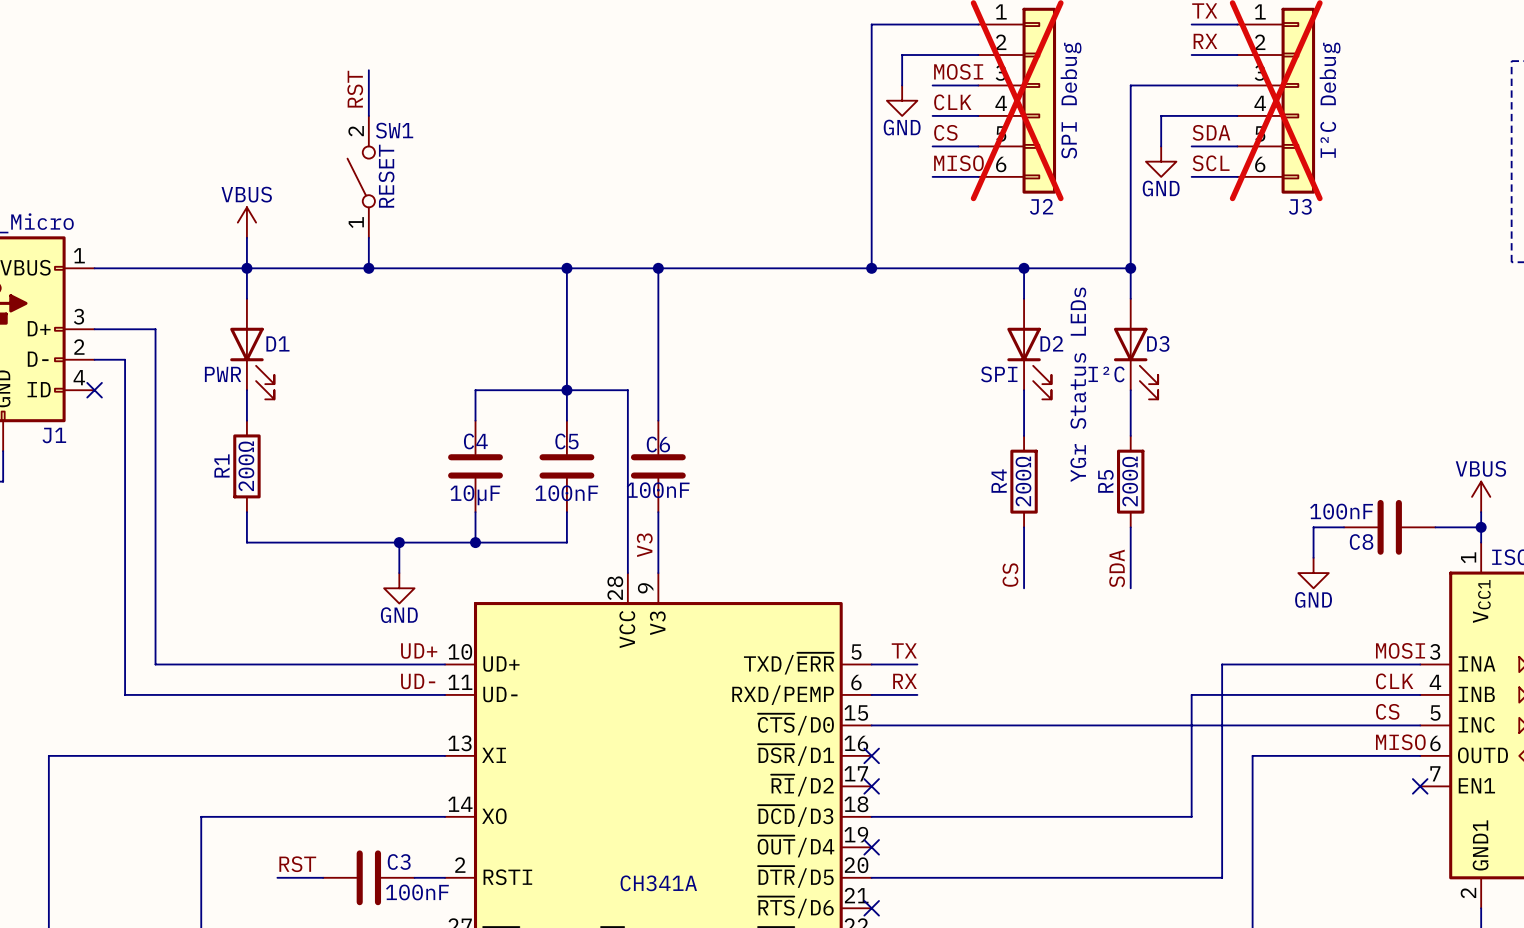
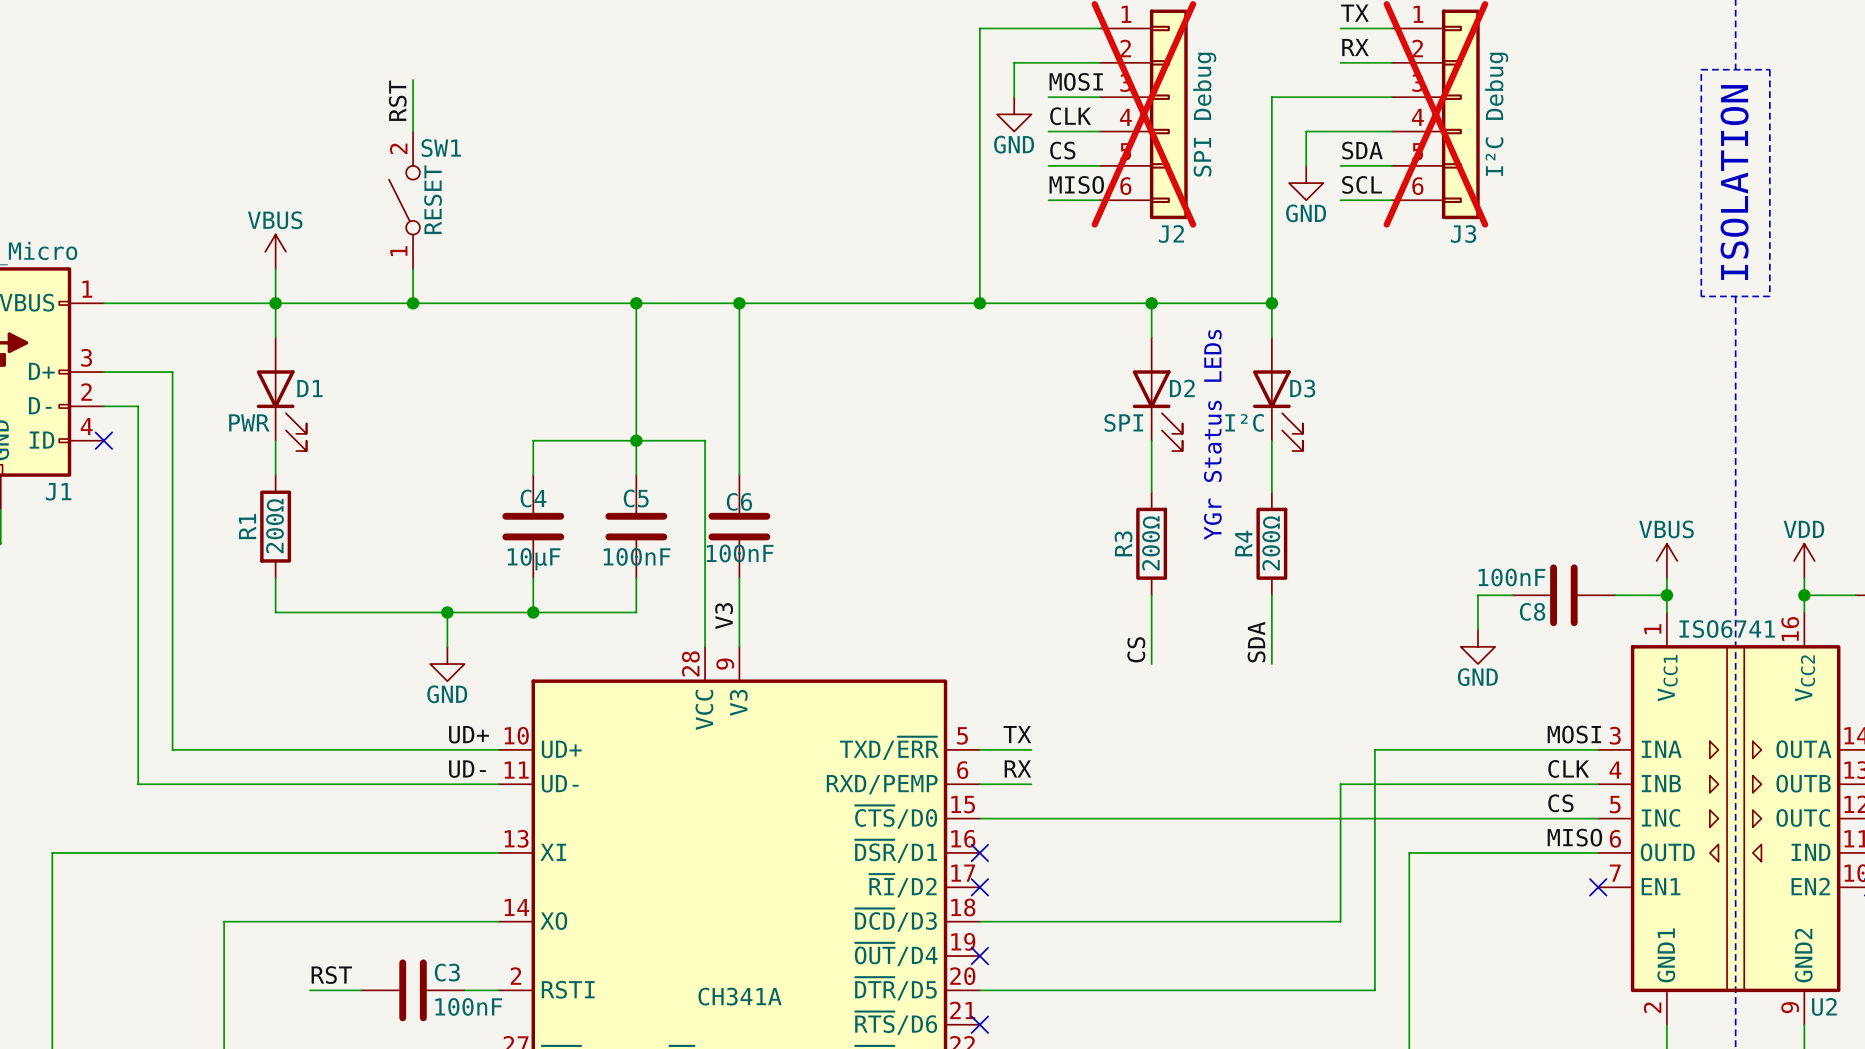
R4 name: R4 (999, 481) -> R3 (1123, 543)
R5 name: R5 (1105, 481) -> R4 (1243, 543)

